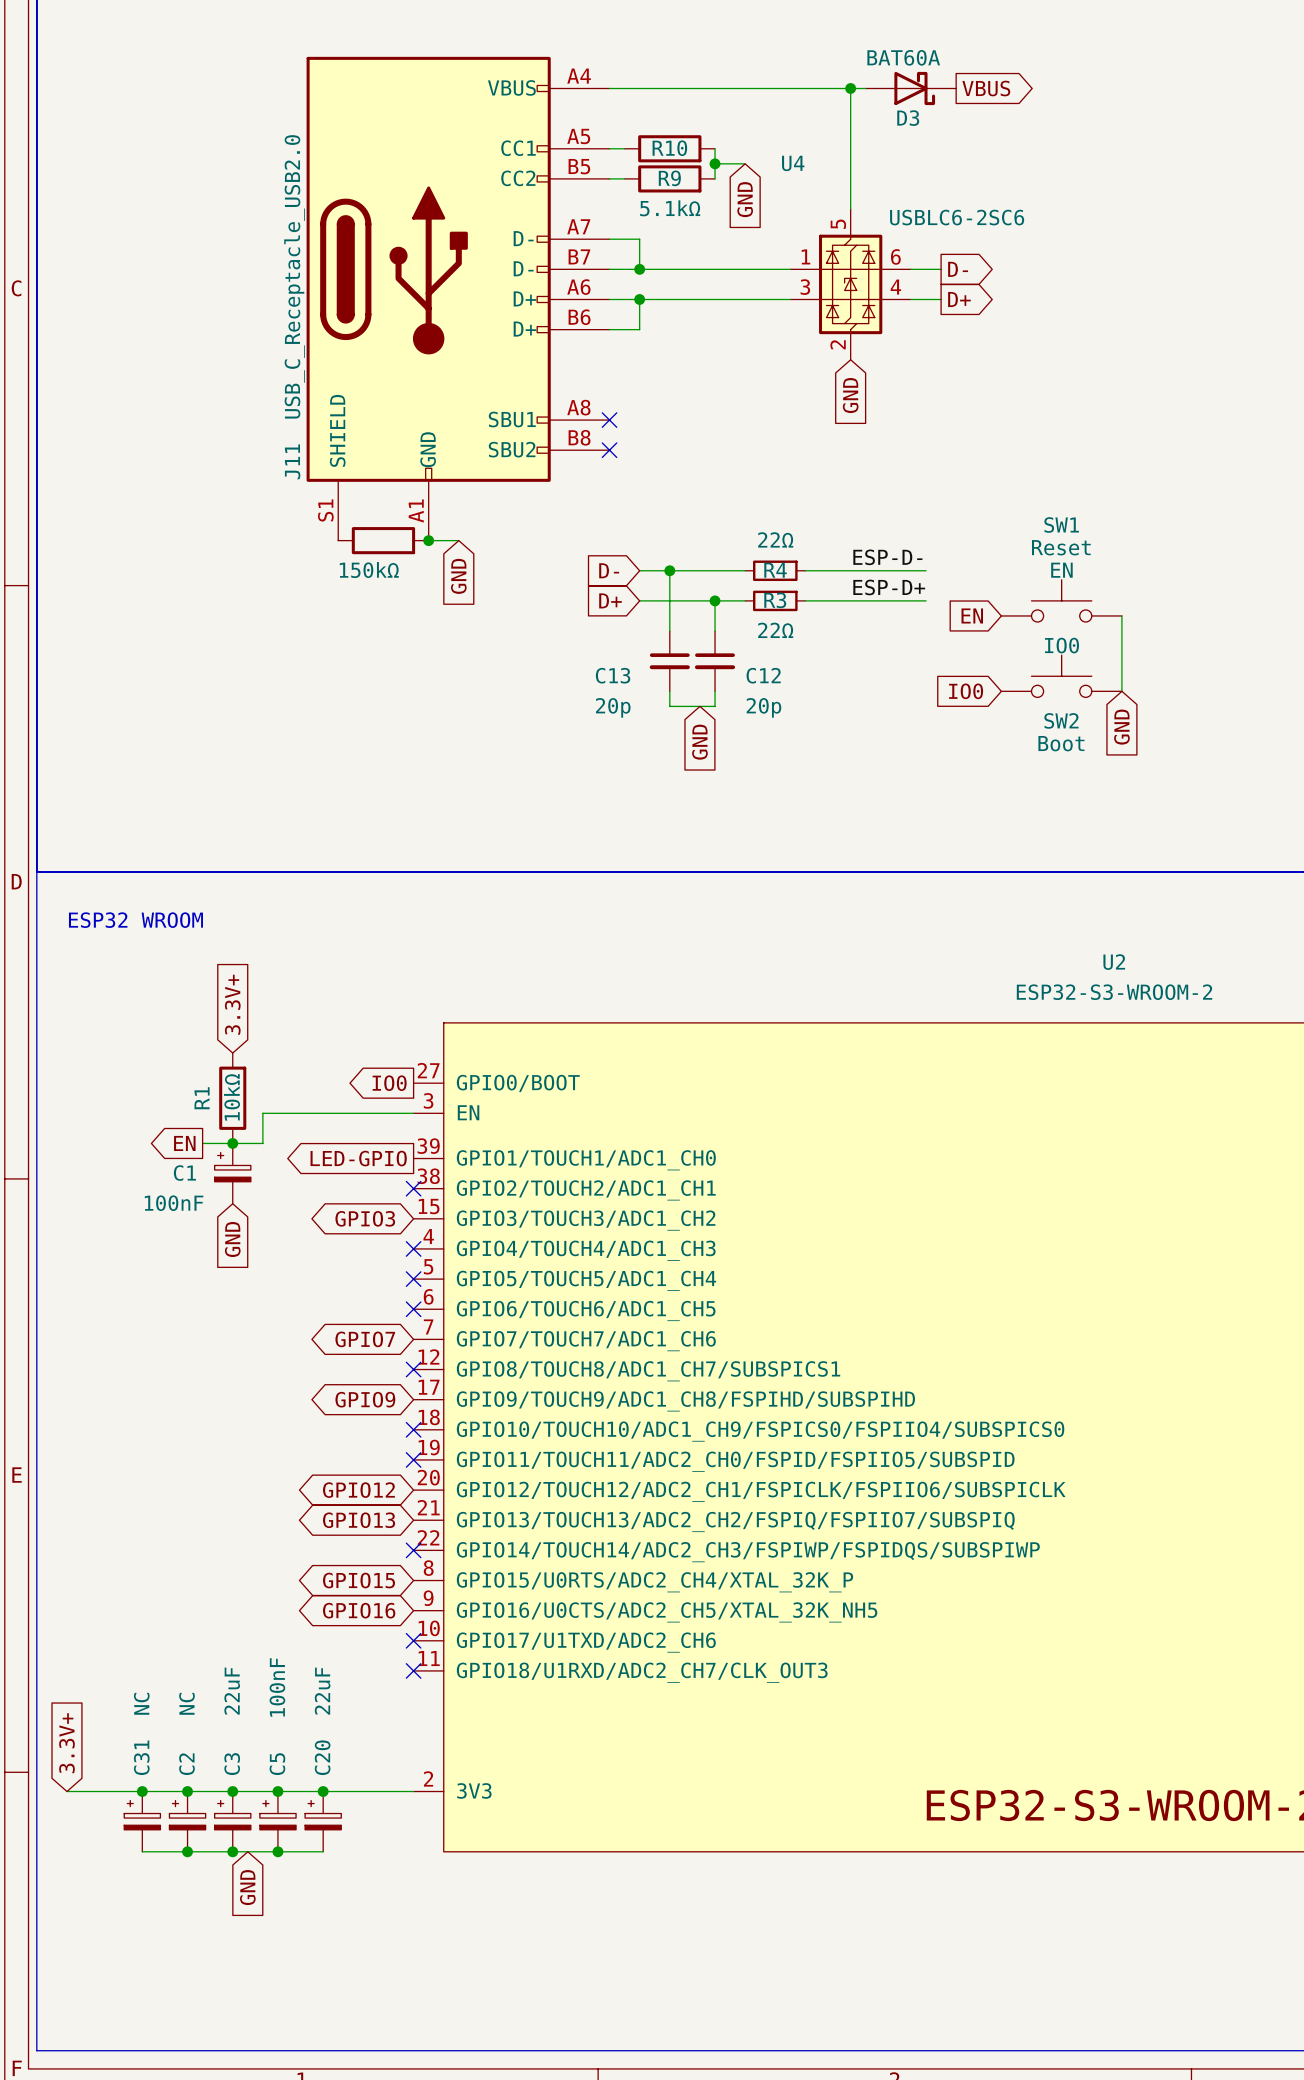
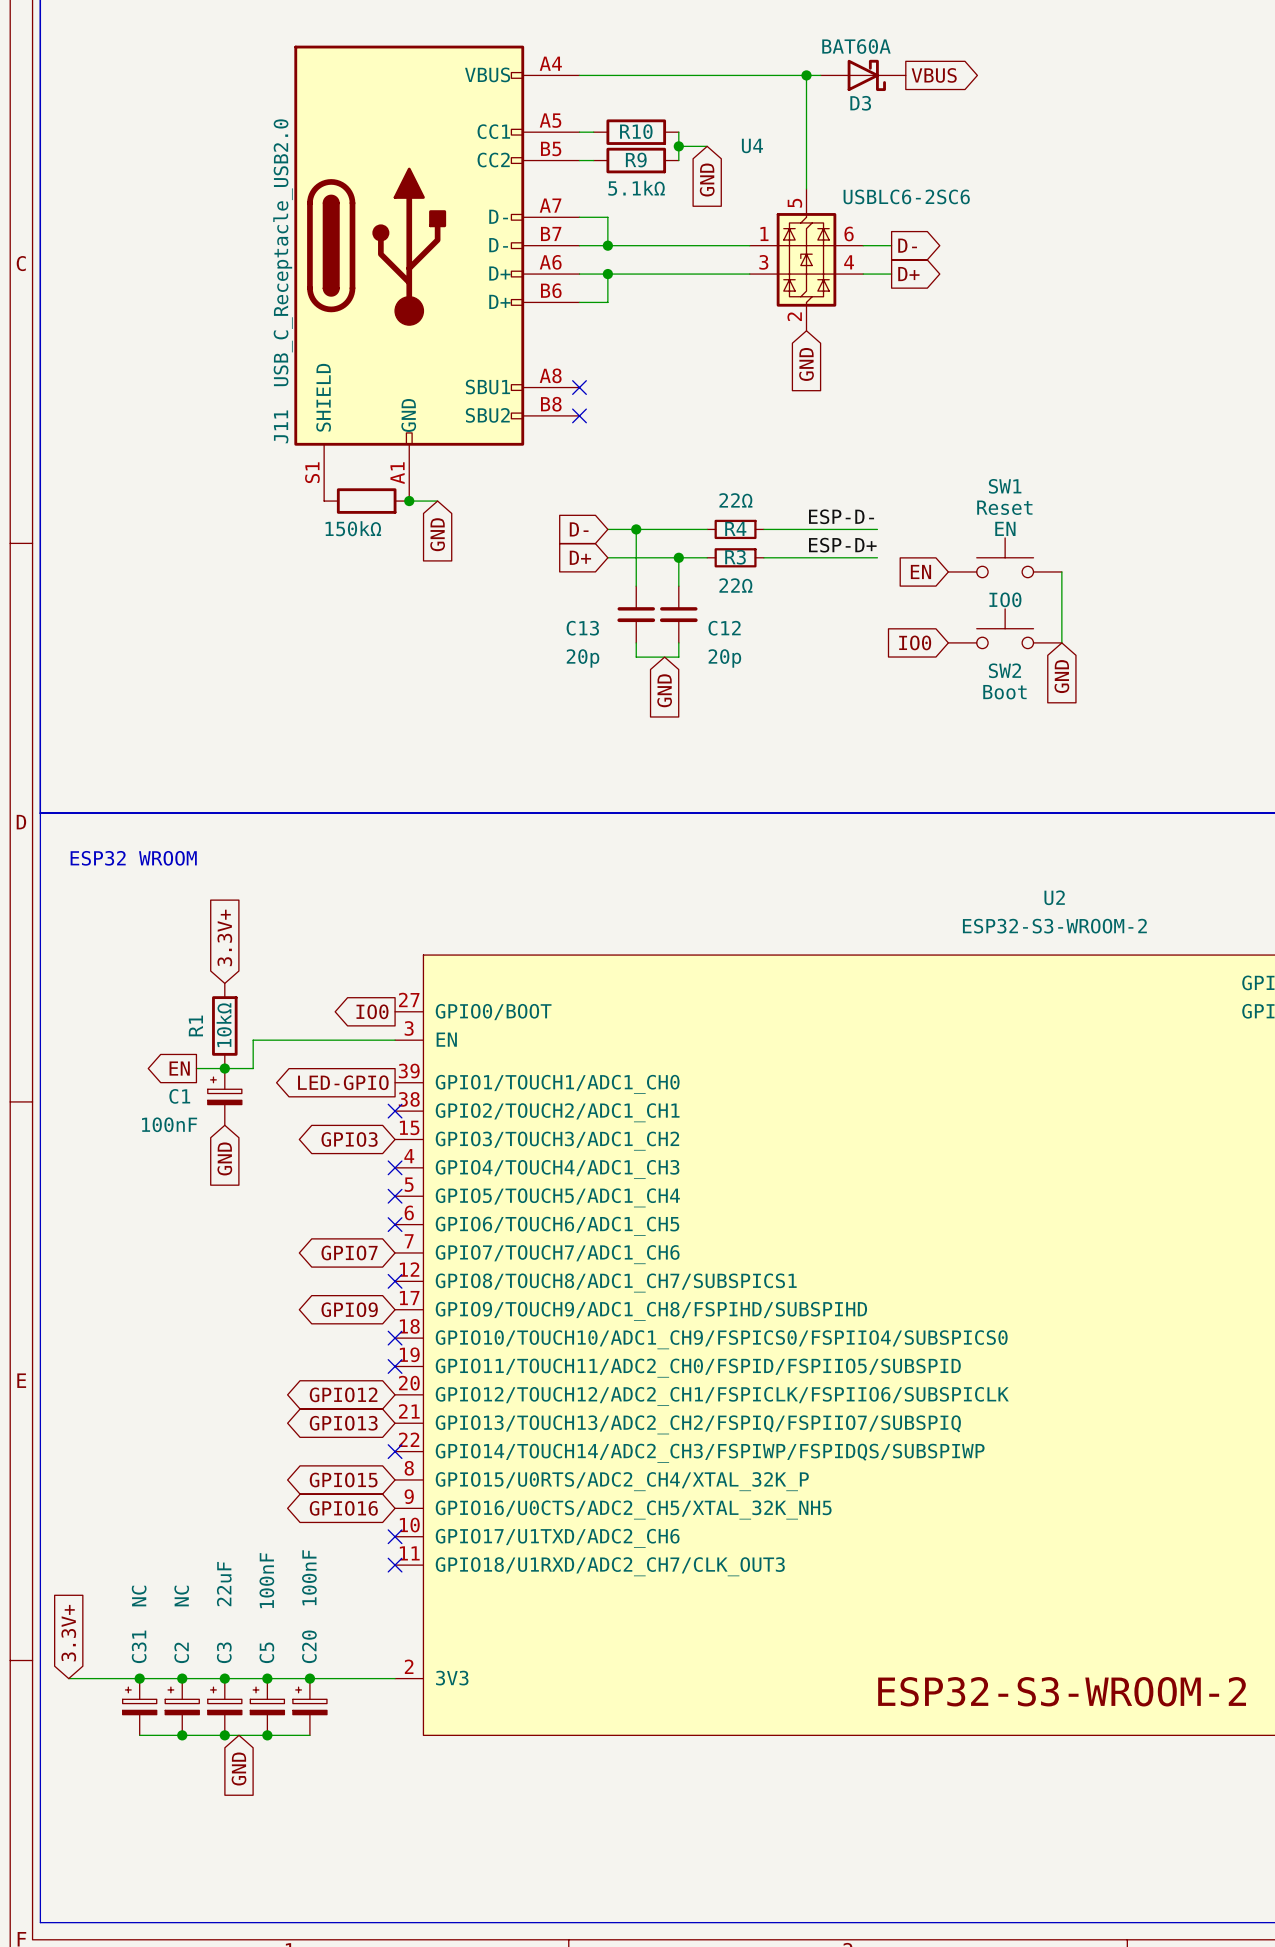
C20 value: 22uF (322, 1691) -> 100nF (309, 1577)

